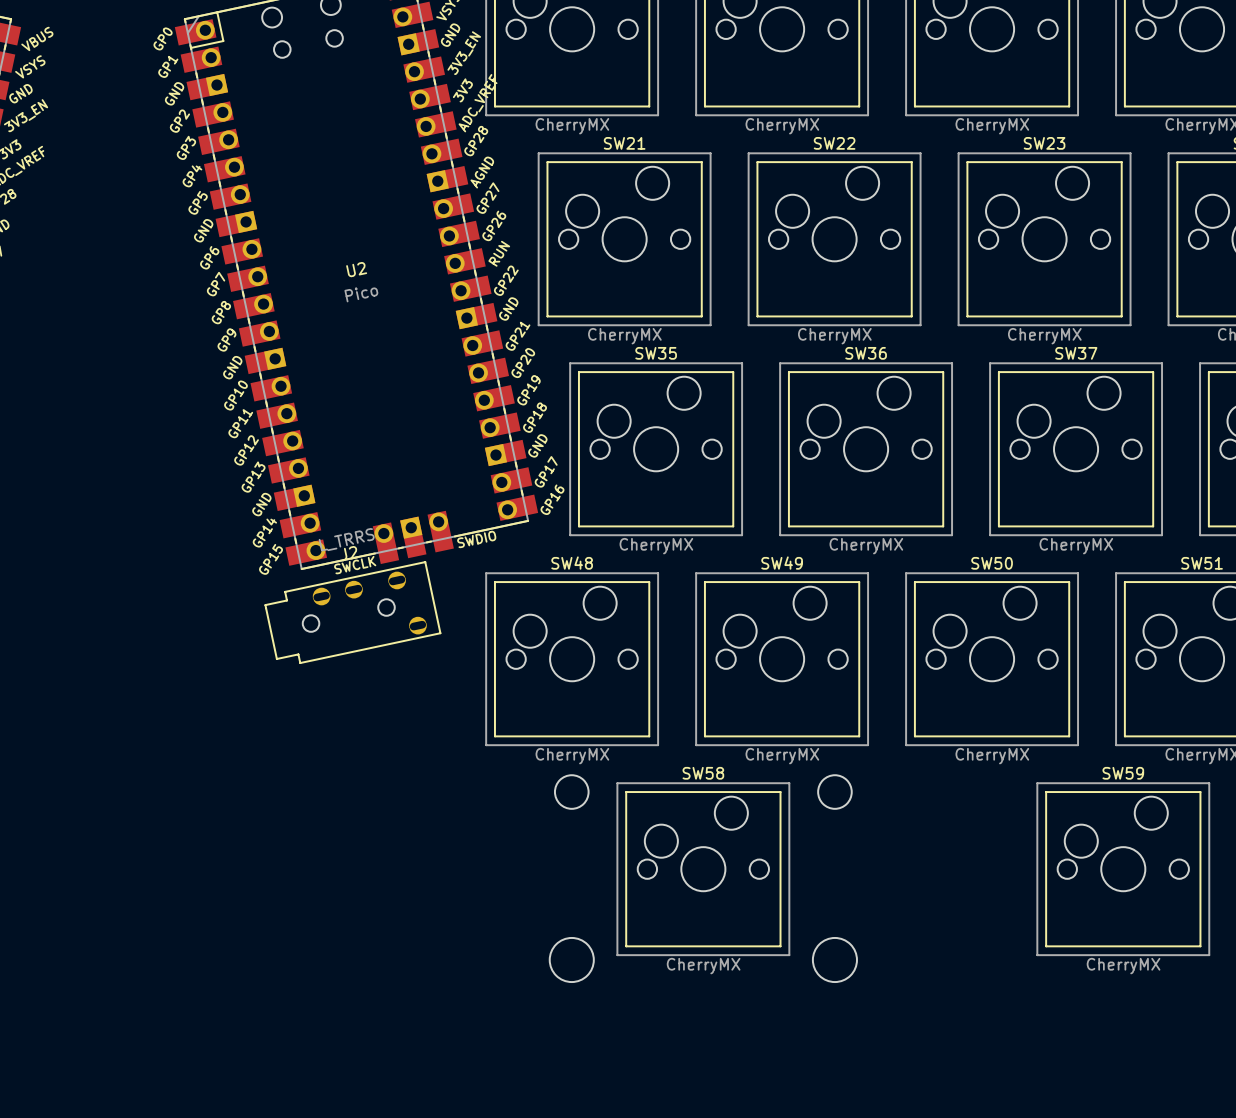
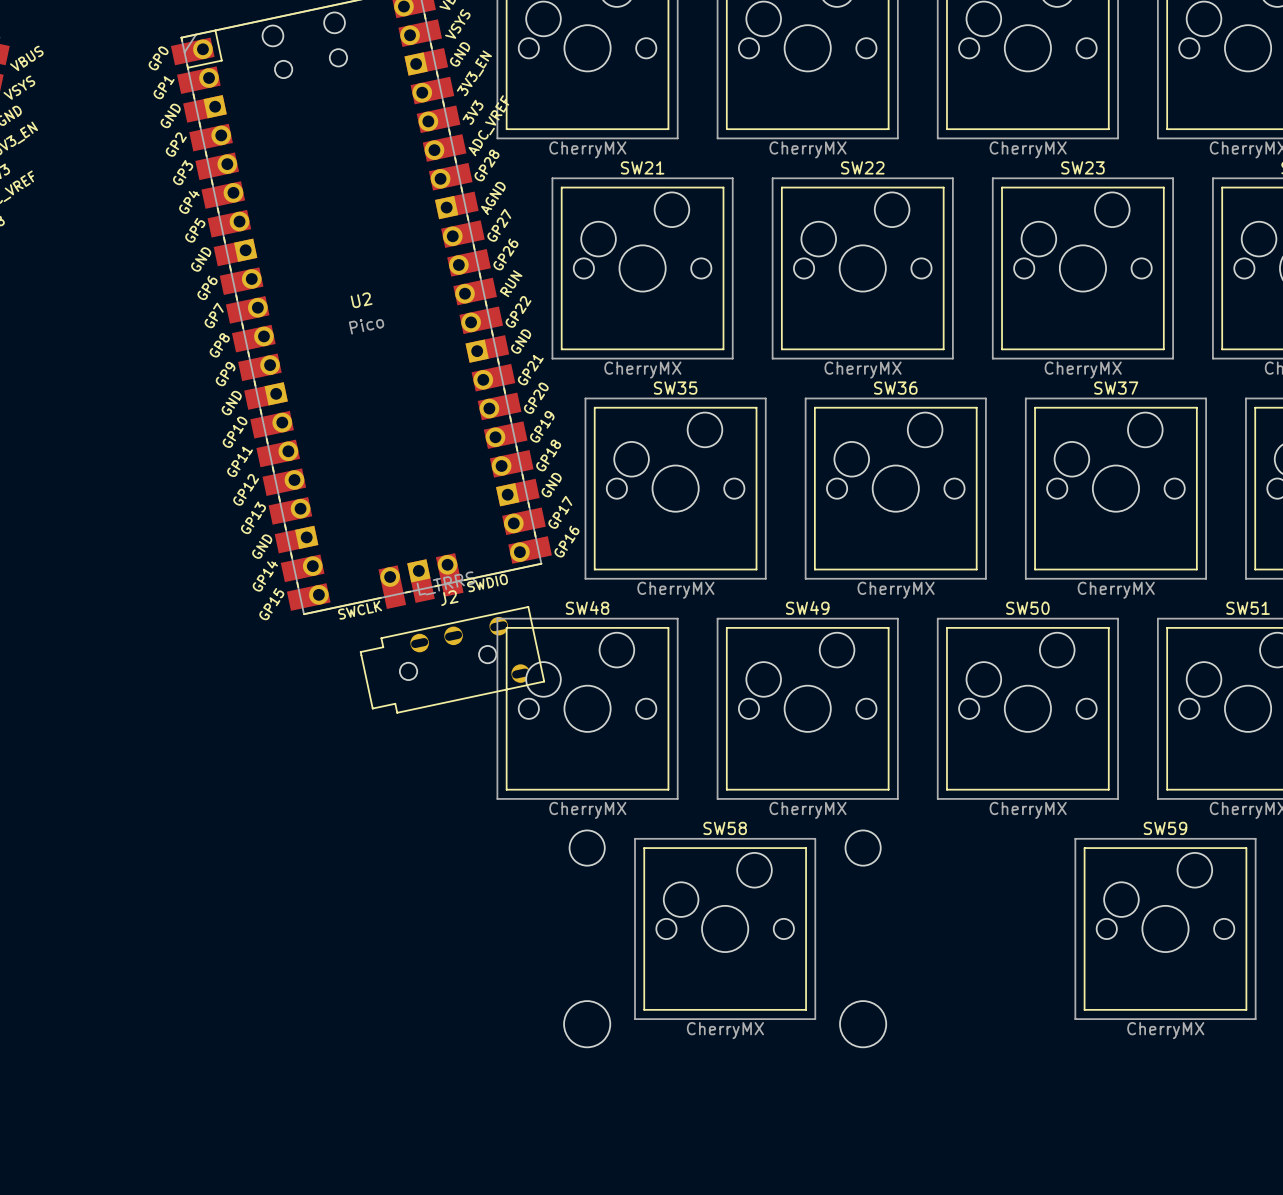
J2 position: (352, 612) -> (452, 659)

